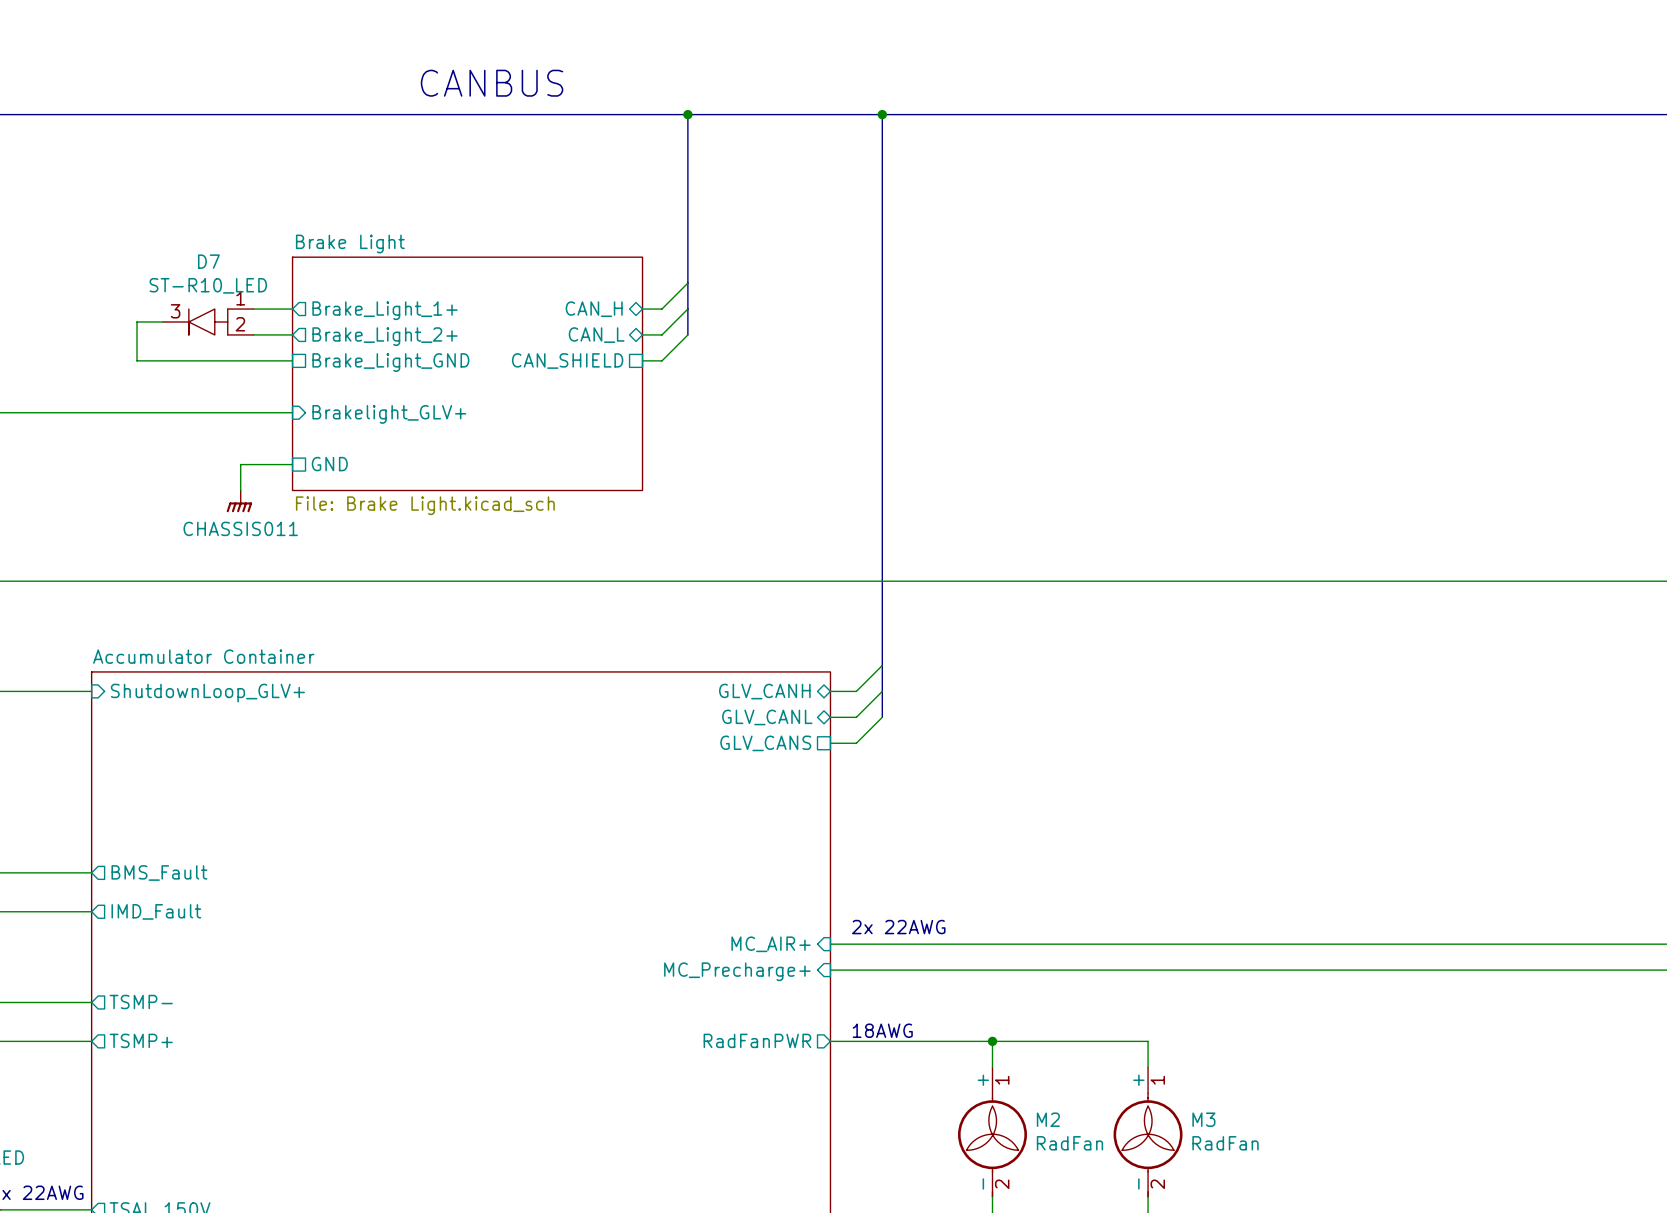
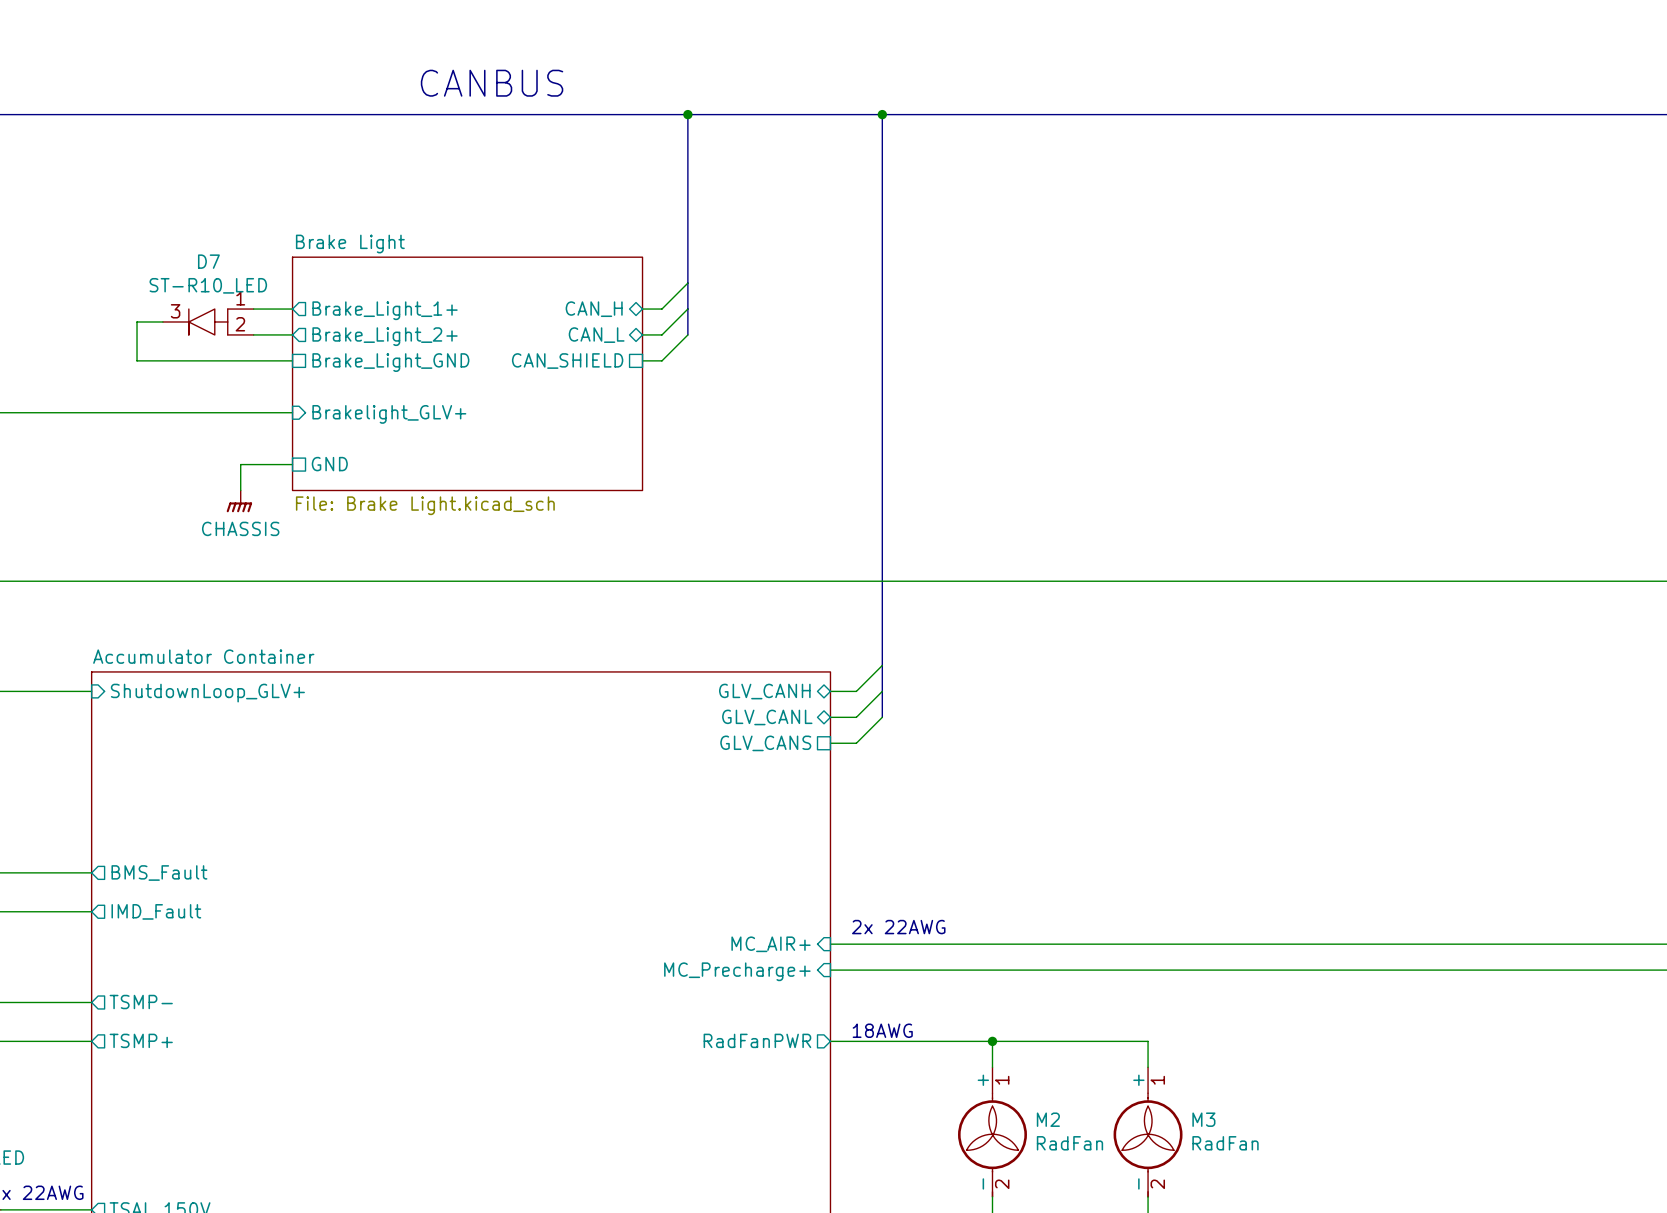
CHASSIS011 name: CHASSIS011 (240, 528) -> CHASSIS (240, 528)

